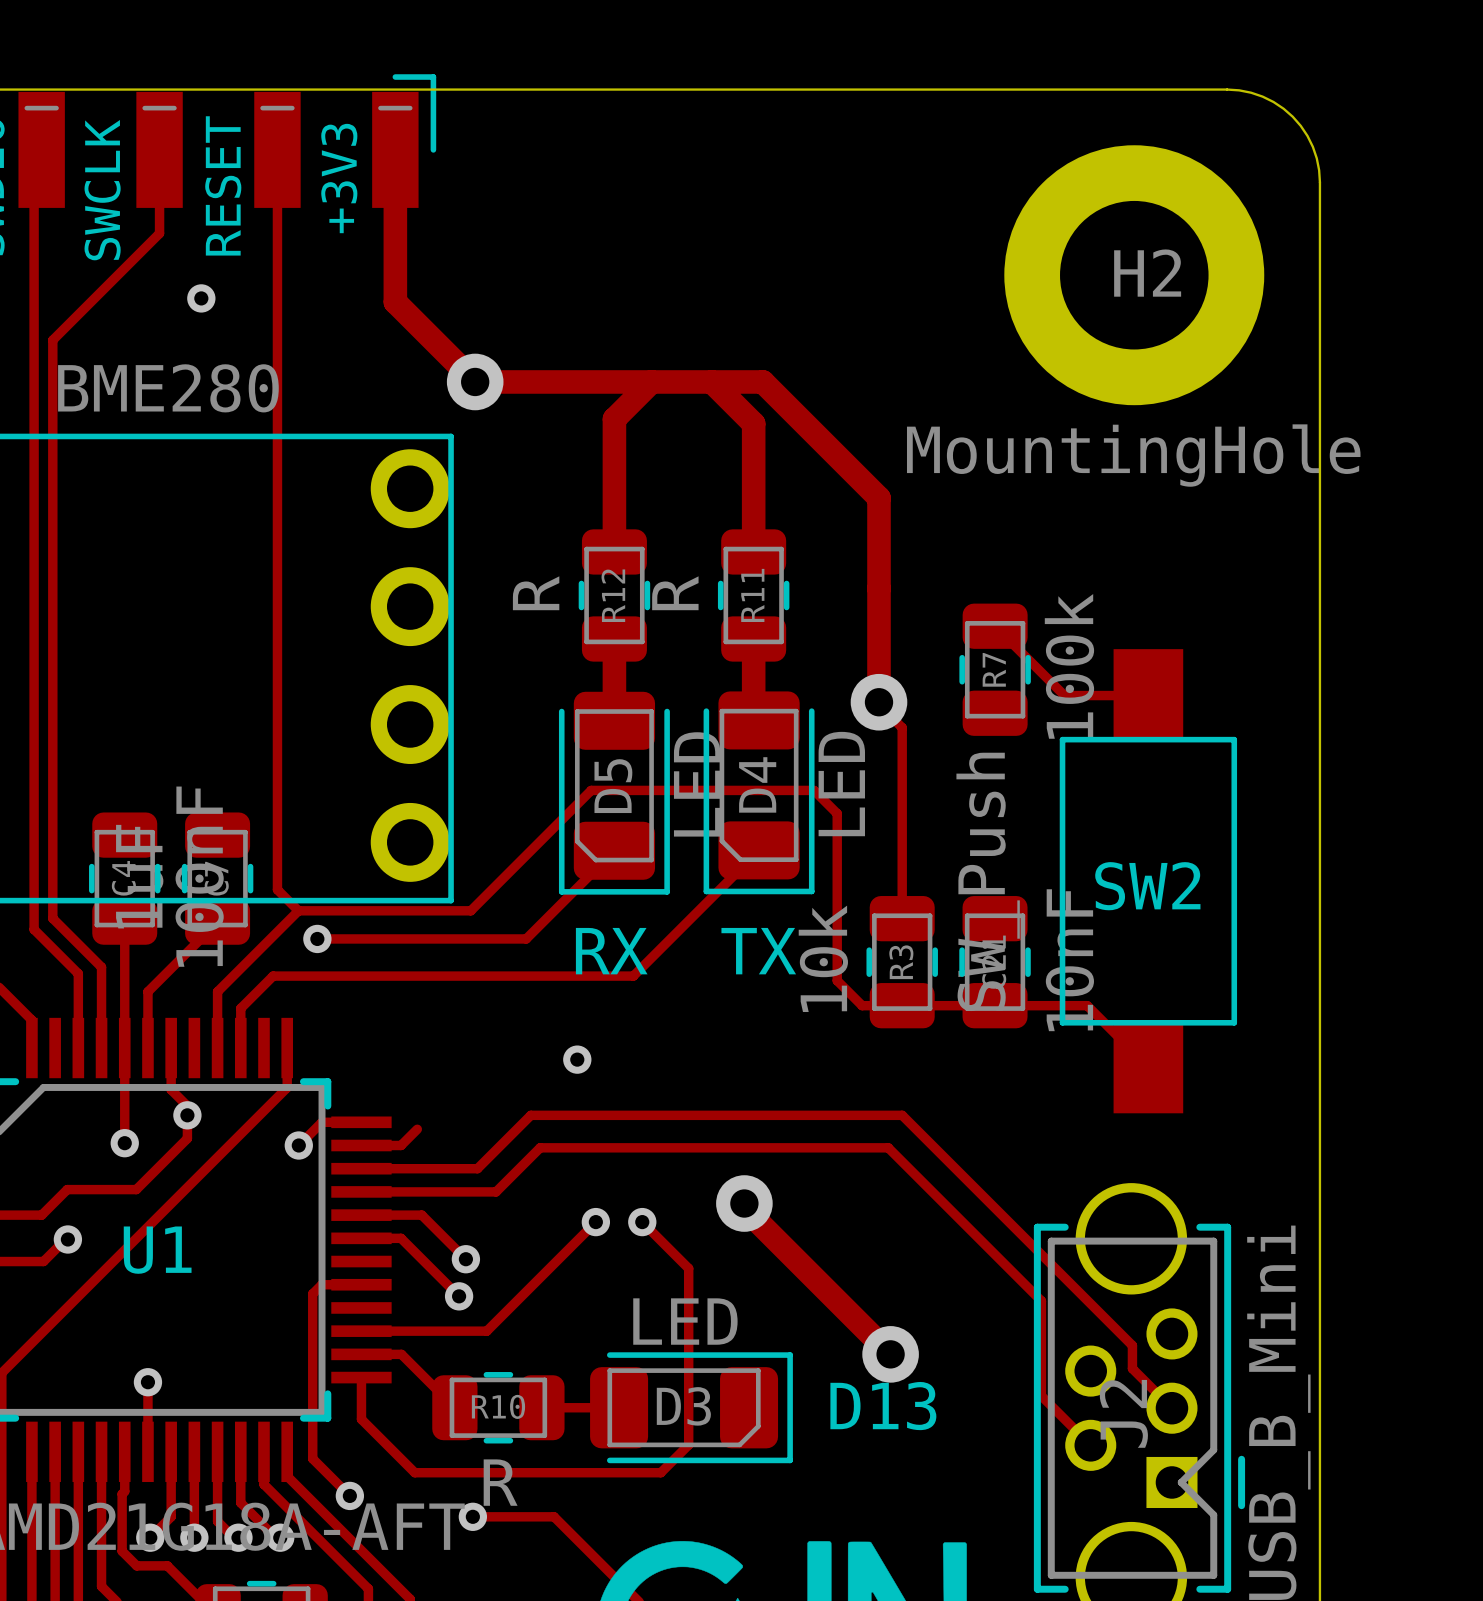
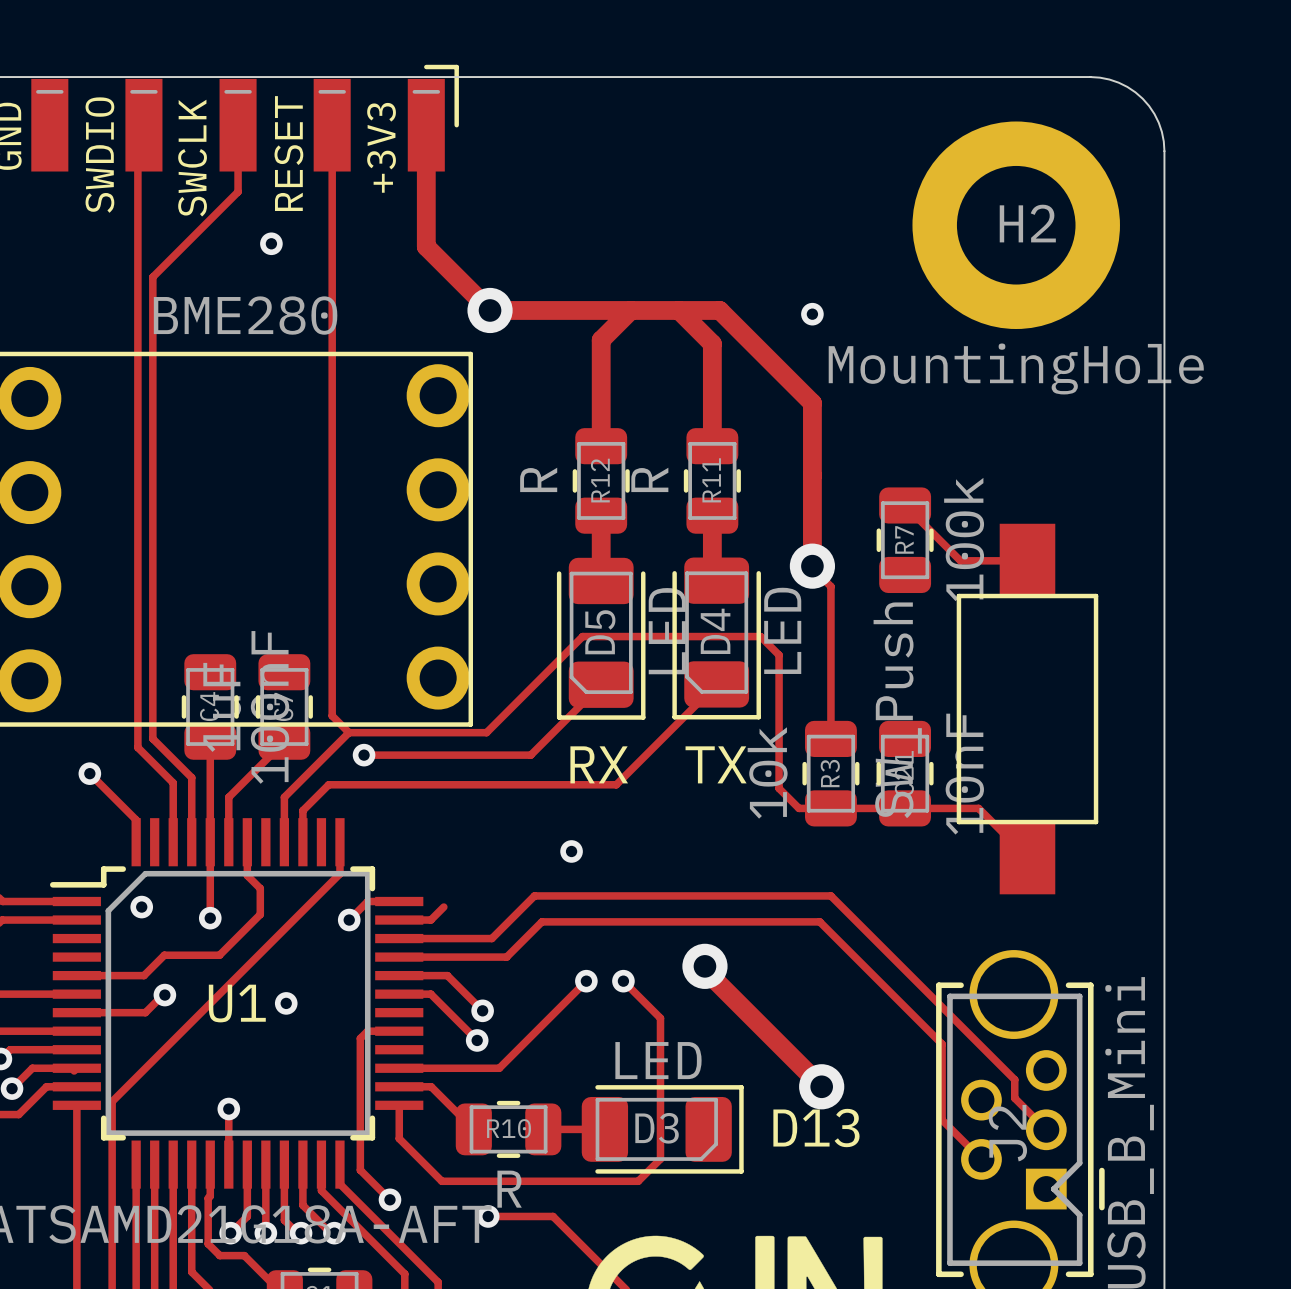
via: none -> (812, 314)
SW2 name: SW2 (1147, 886) -> none
via: (187, 1115) -> none
via: none -> (141, 907)
via: none -> (286, 1003)

